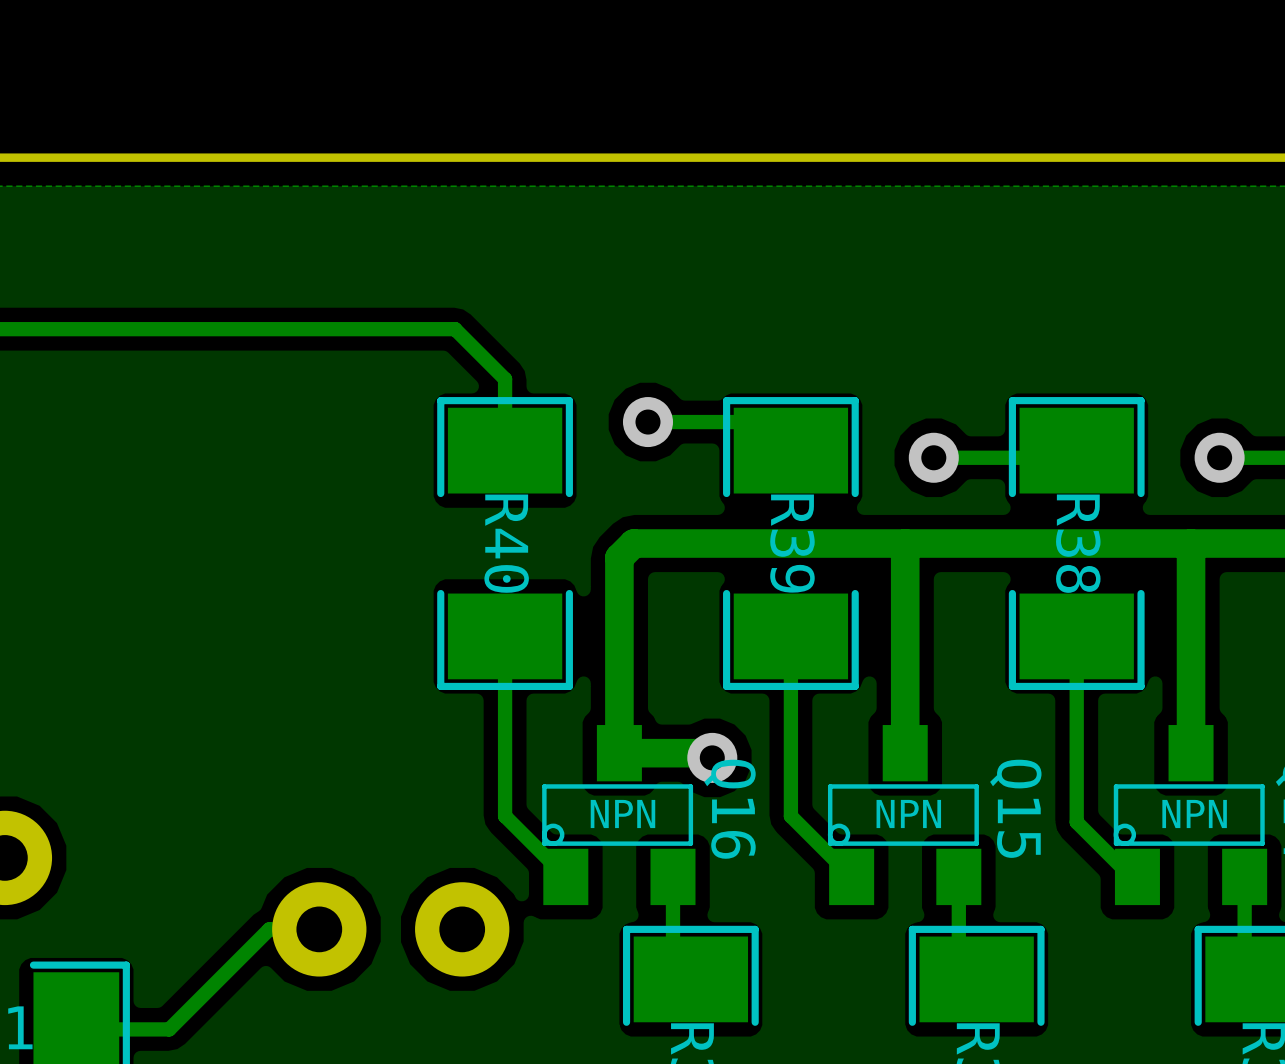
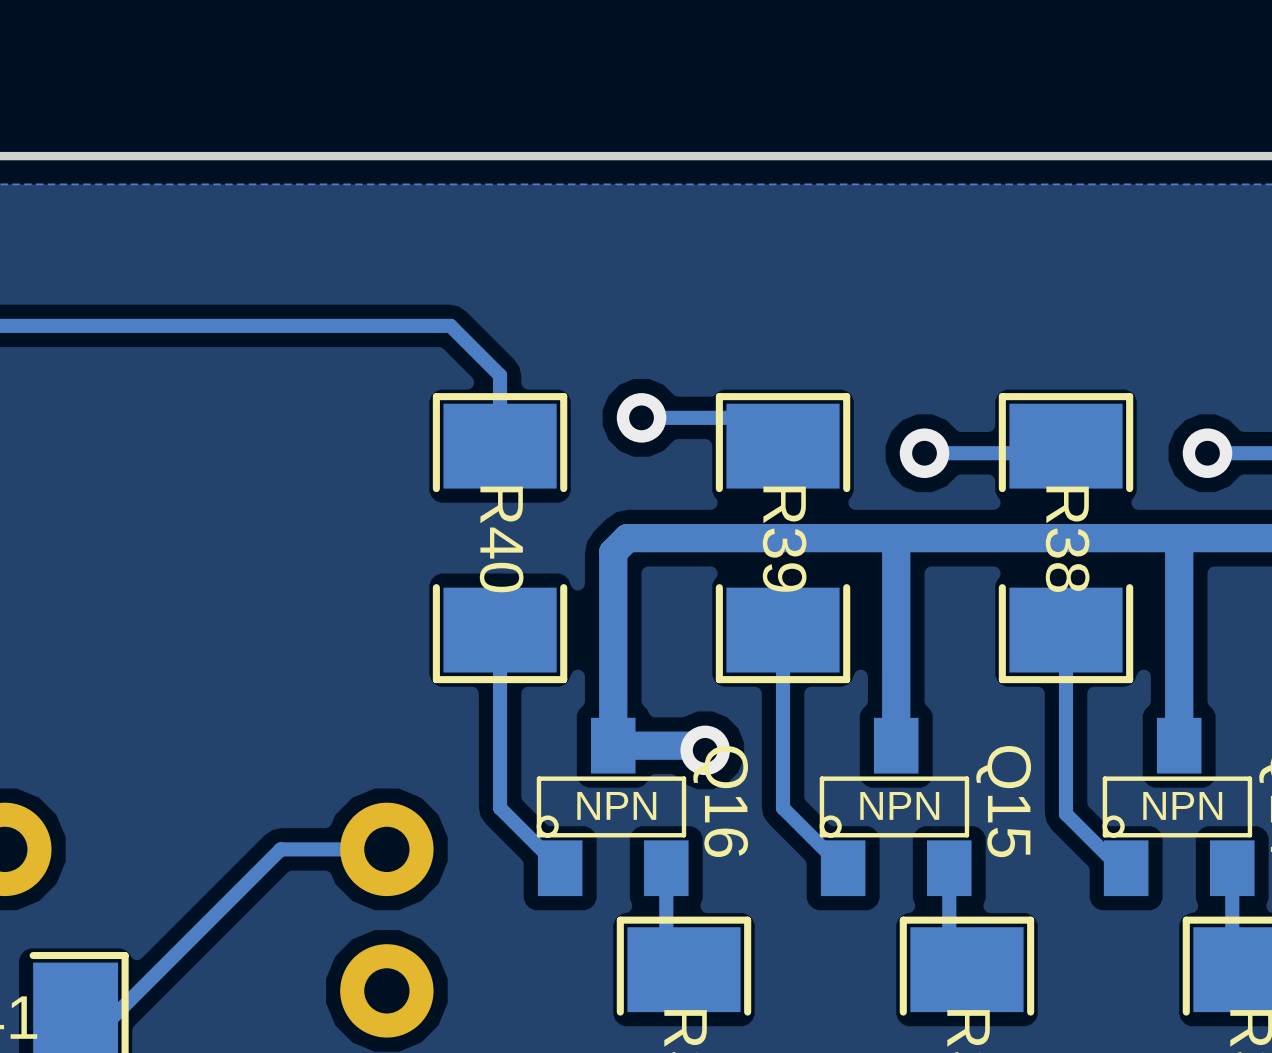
track: (319, 929) (269, 929) (169, 1029) (112, 1029) -> (386, 849) (280, 849) (110, 1019)
part rotation: 0° (390, 929) -> 90° clockwise (386, 920)

